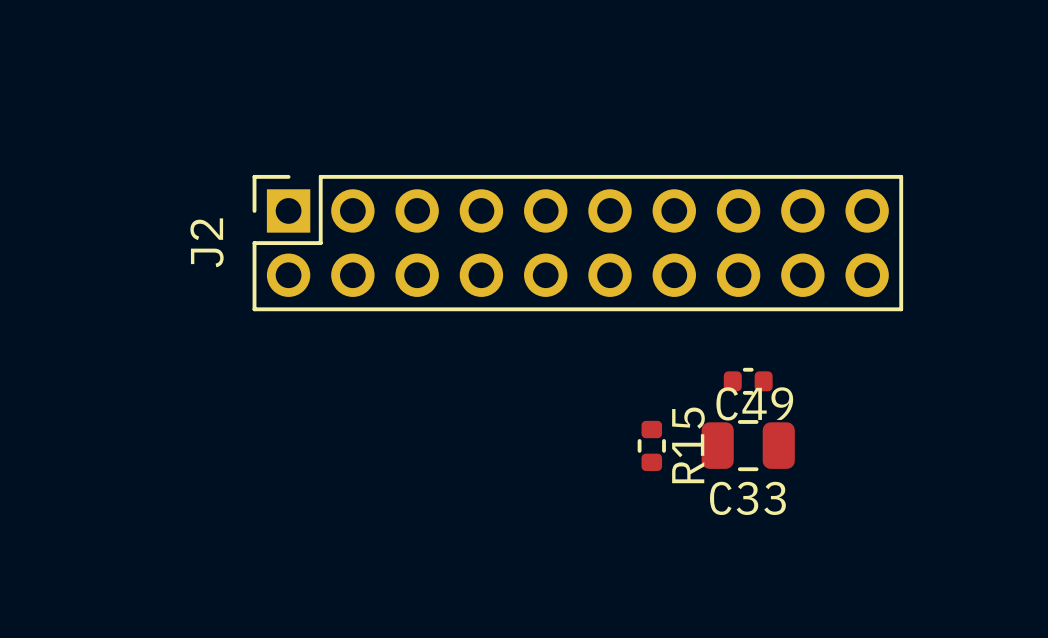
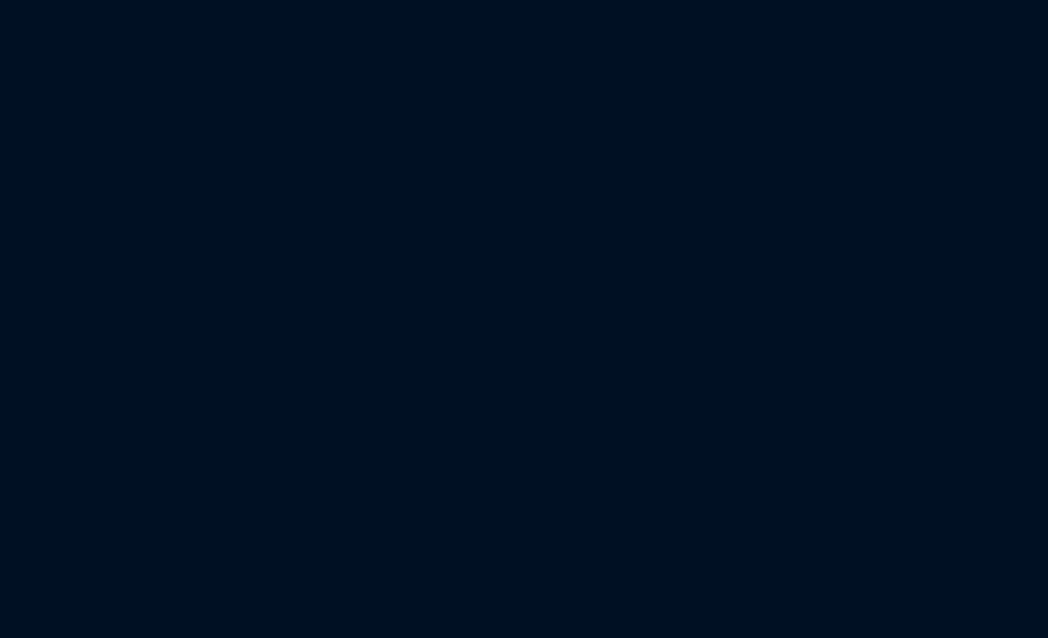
J2: (577, 243) -> none
C49: (748, 381) -> none
R15: (651, 445) -> none
C33: (748, 445) -> none

